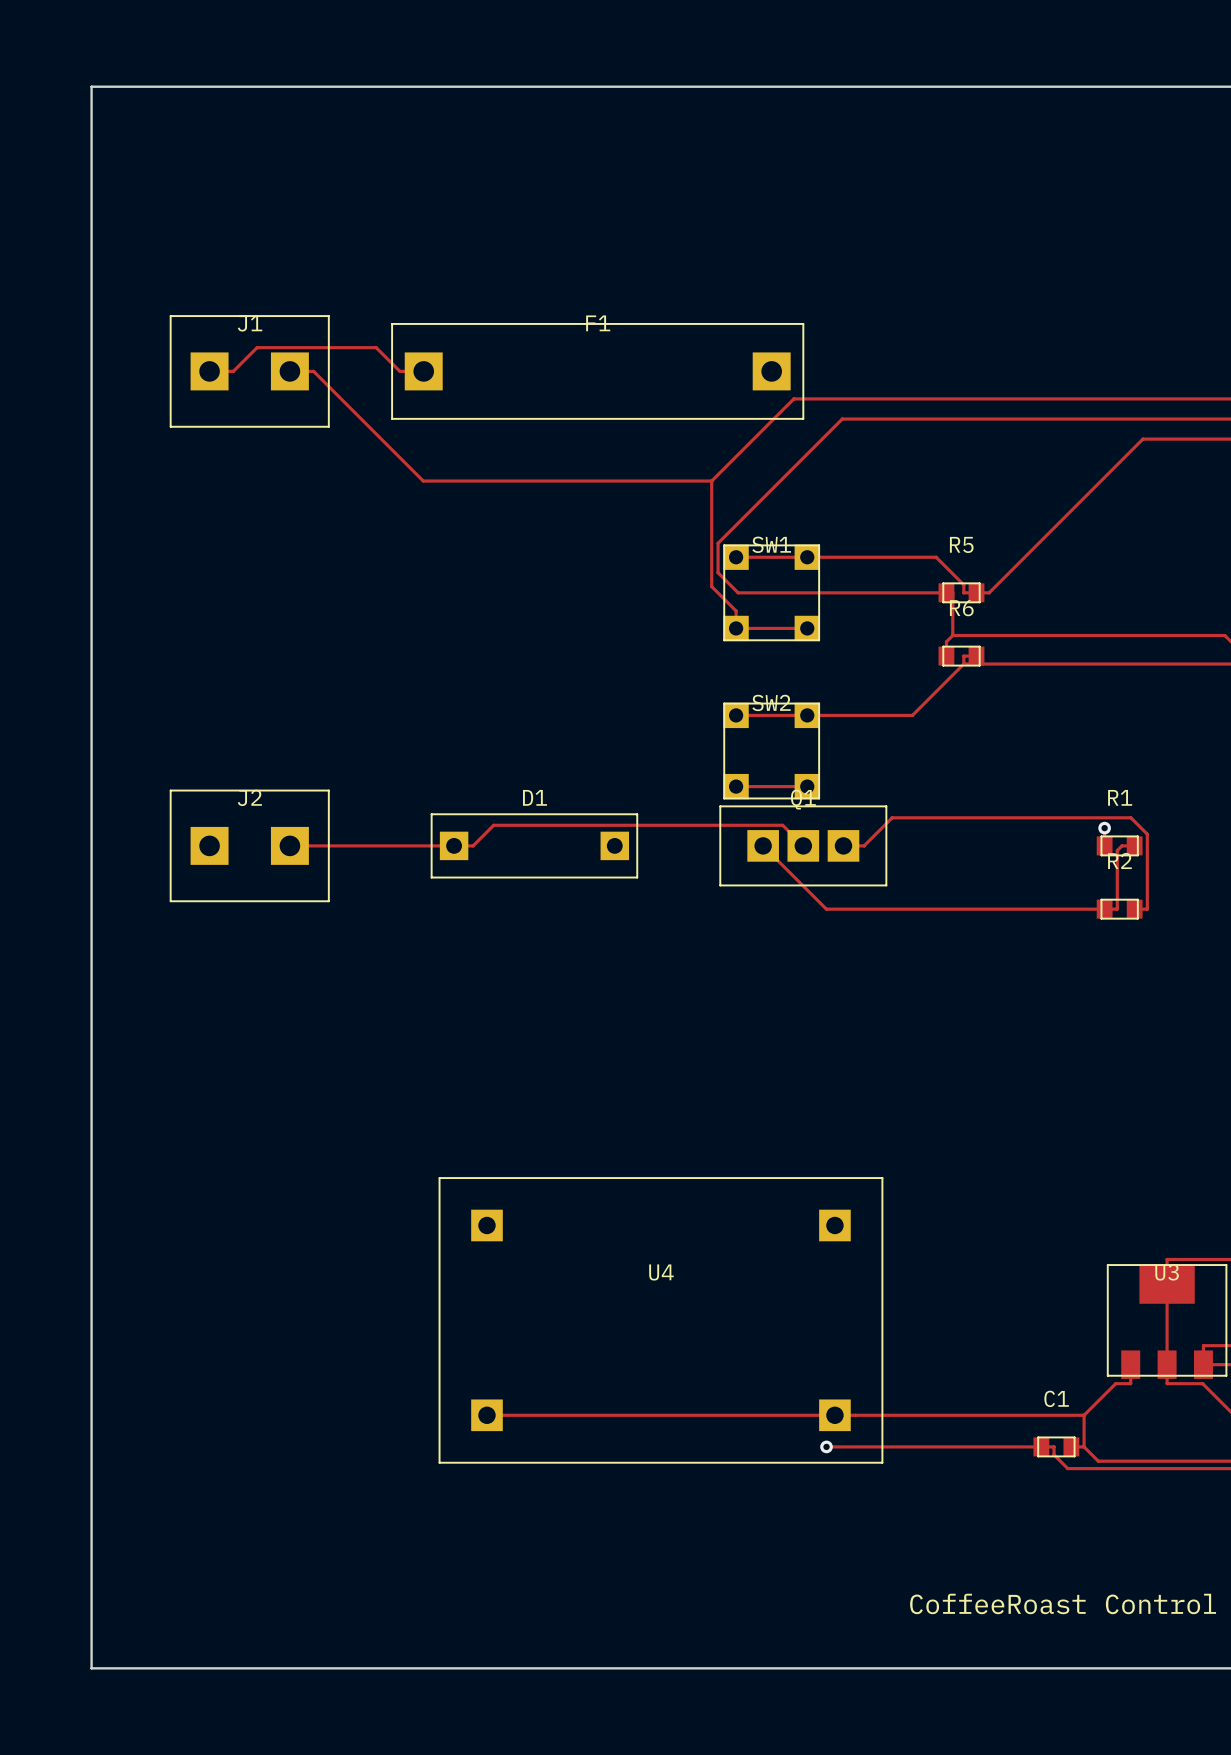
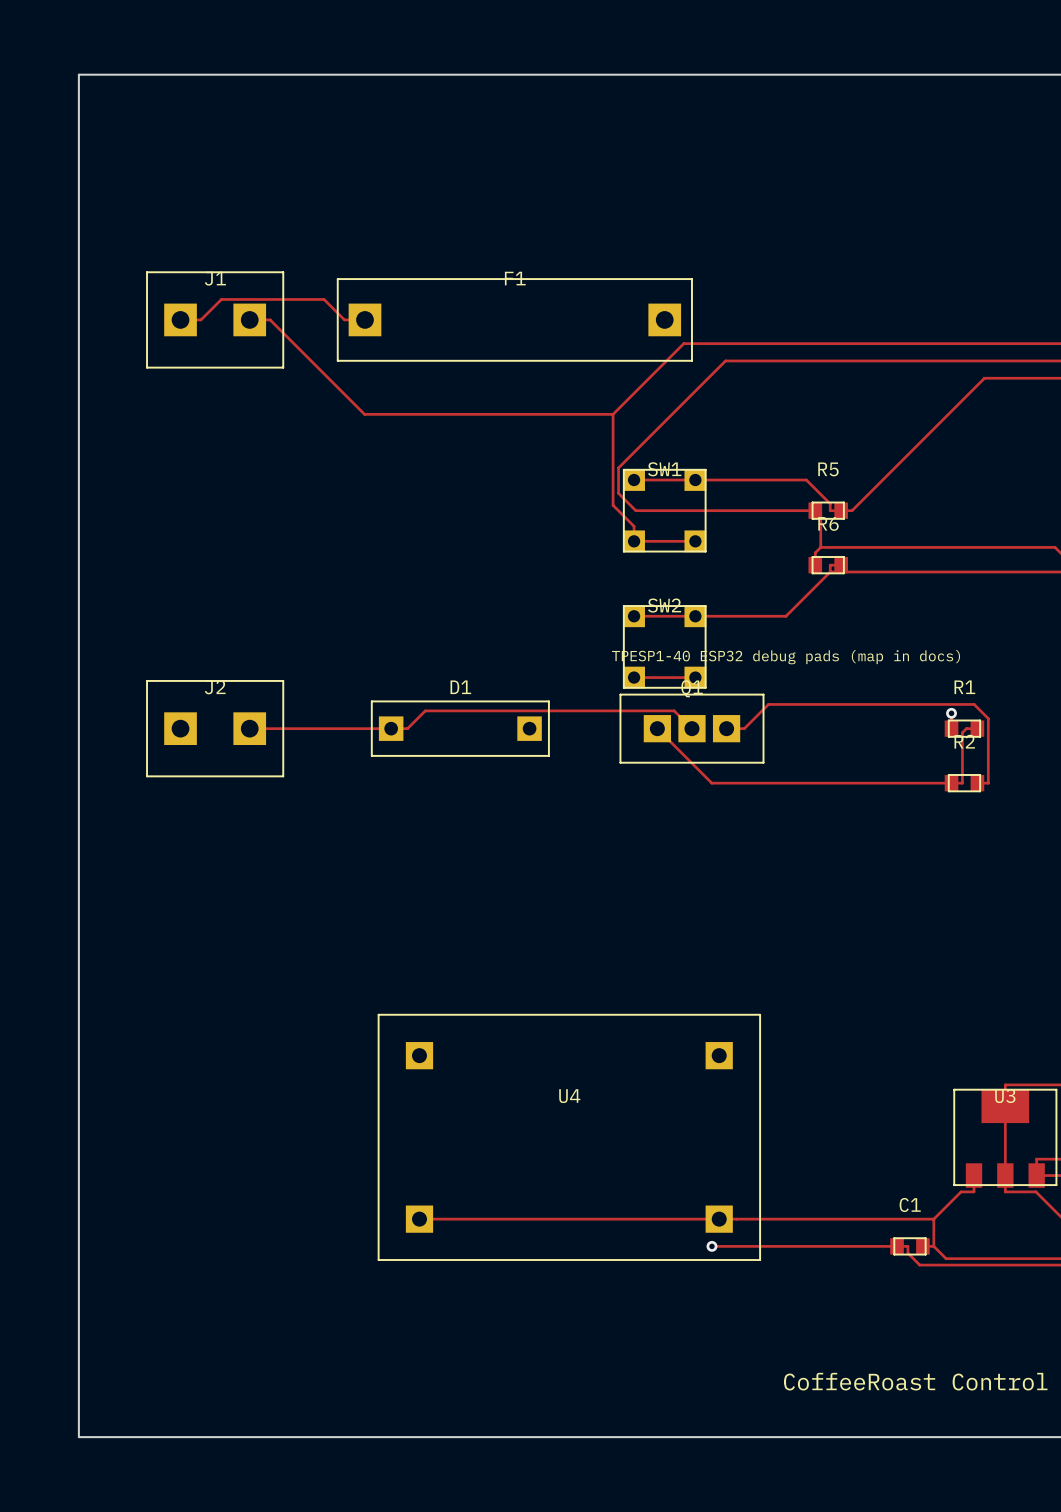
text: none -> TPESP1-40 ESP32 debug pads (map in docs) (786, 657)

